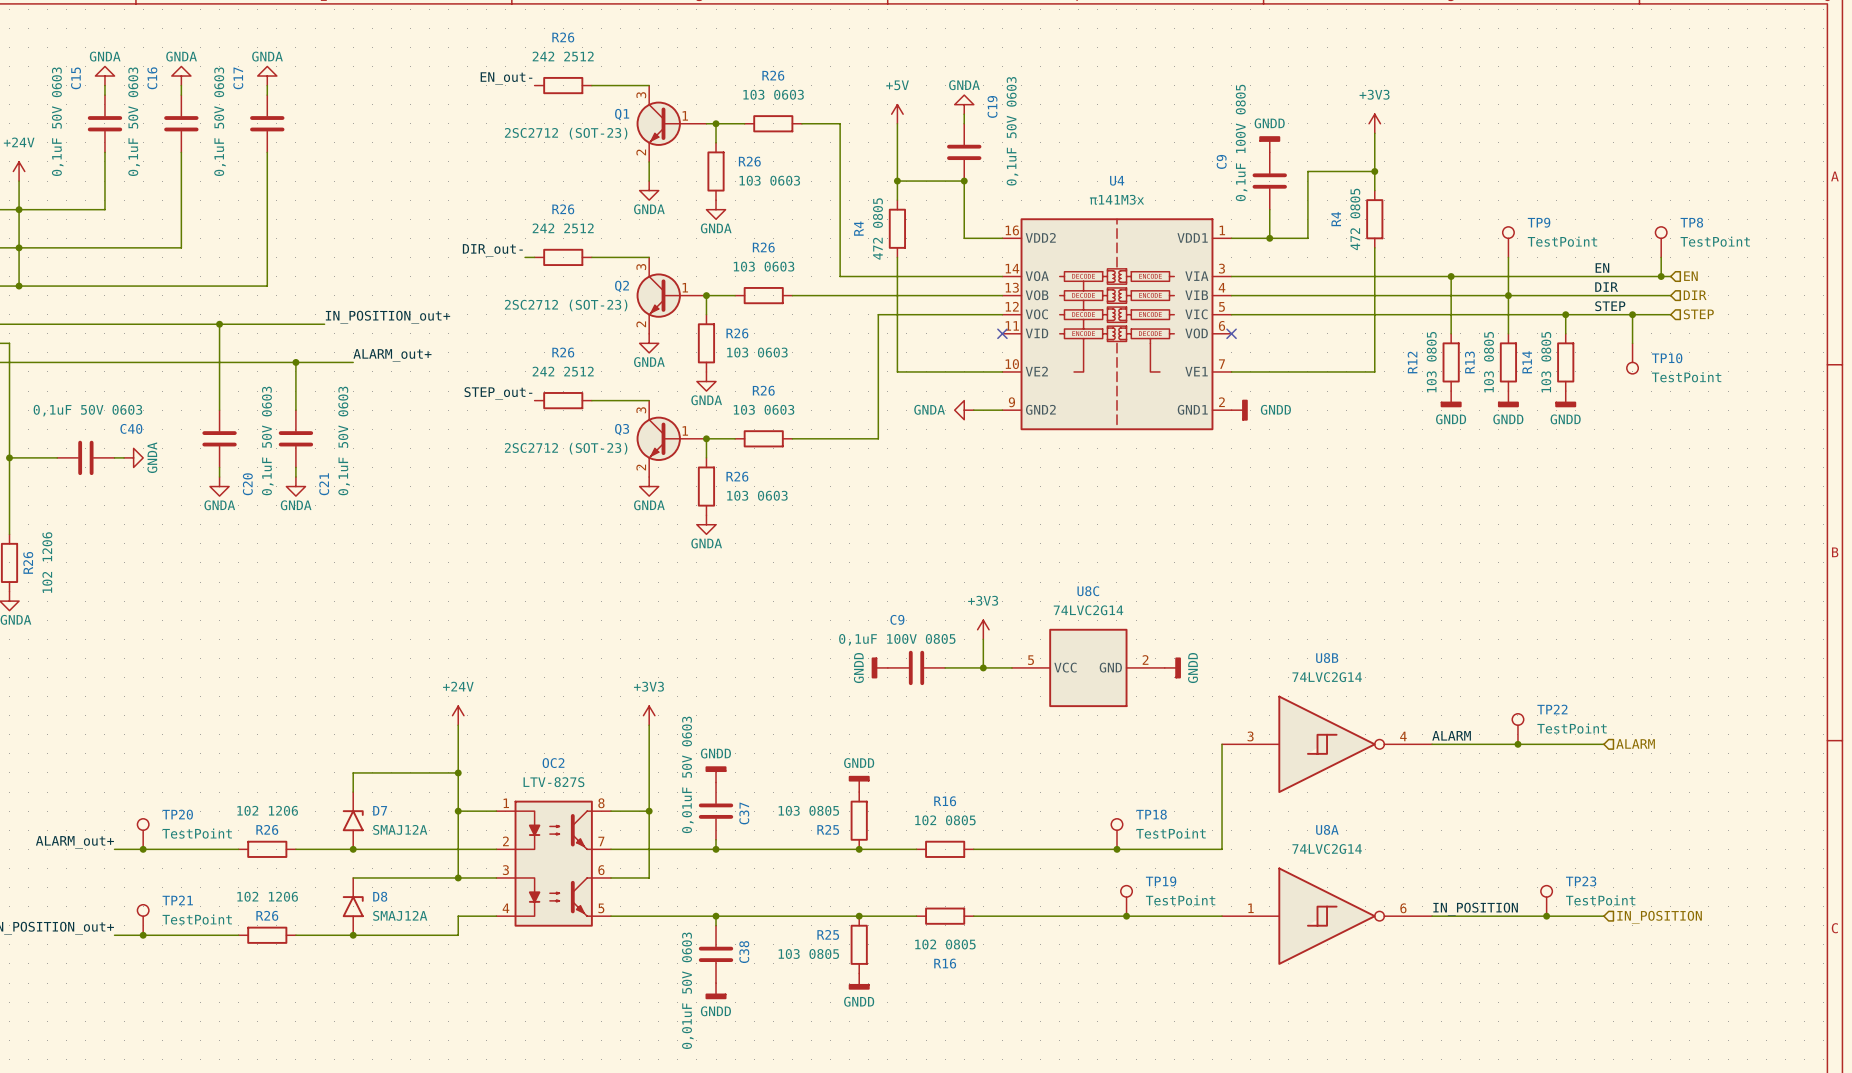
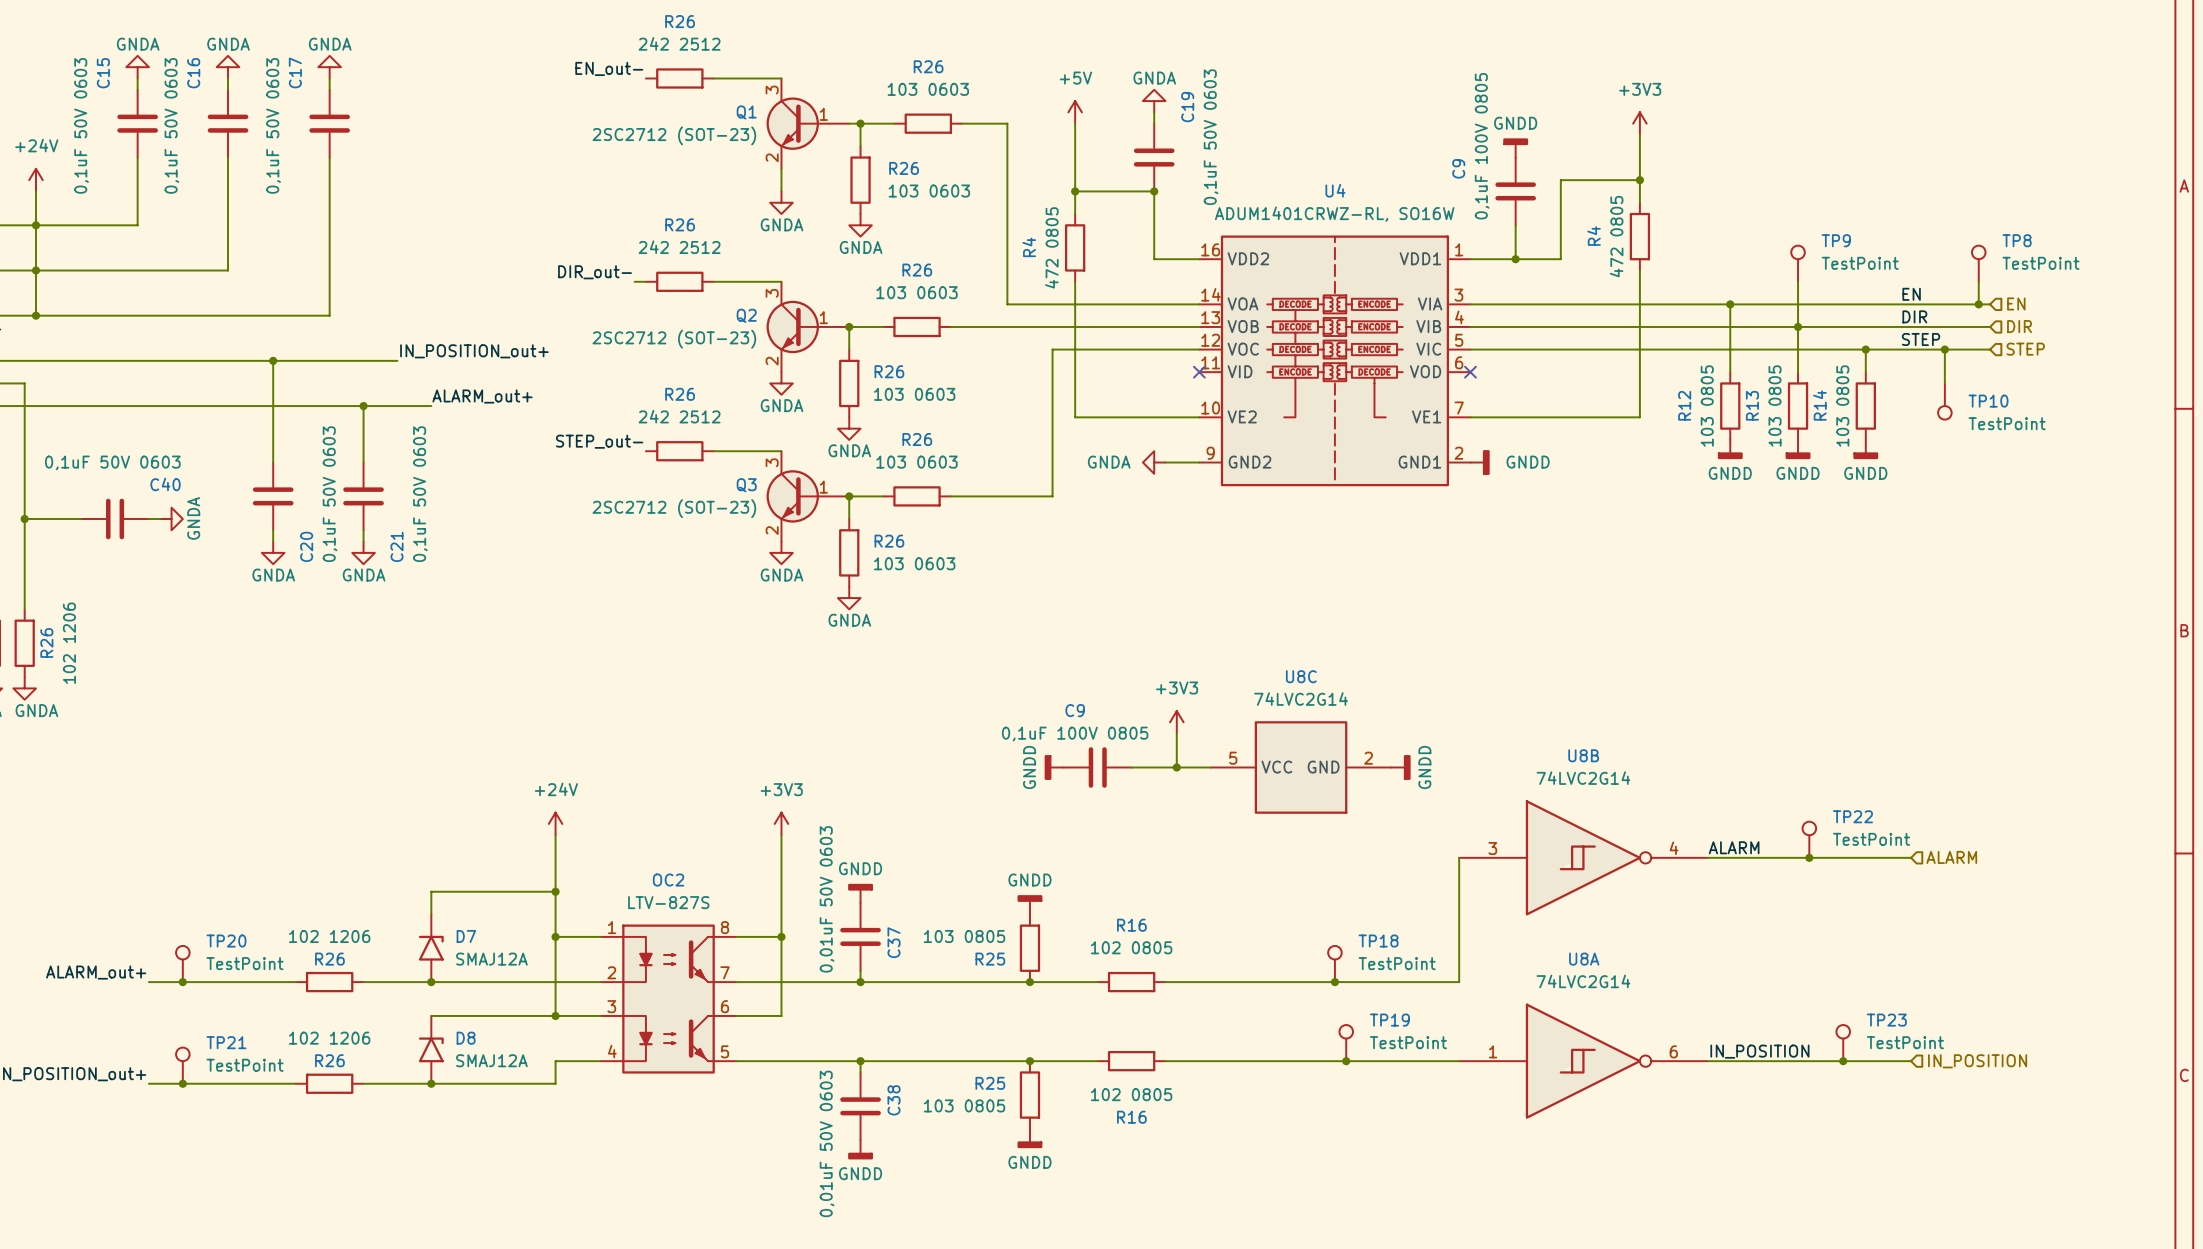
U4 value: π141M3x (1117, 199) -> ADUM1401CRWZ-RL, SO16W (1334, 214)

